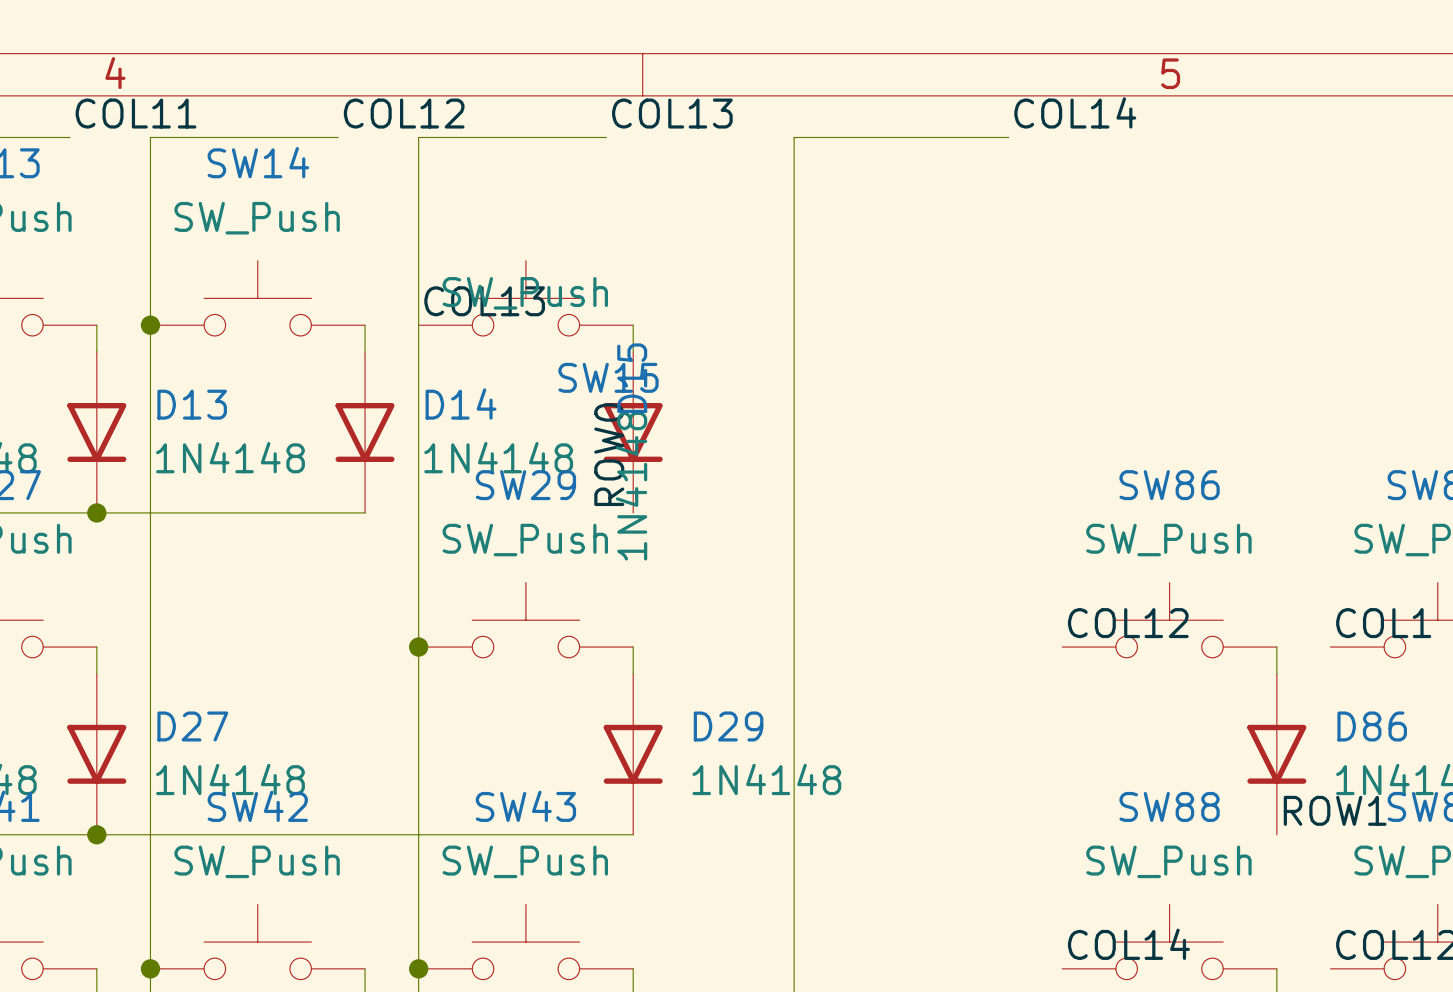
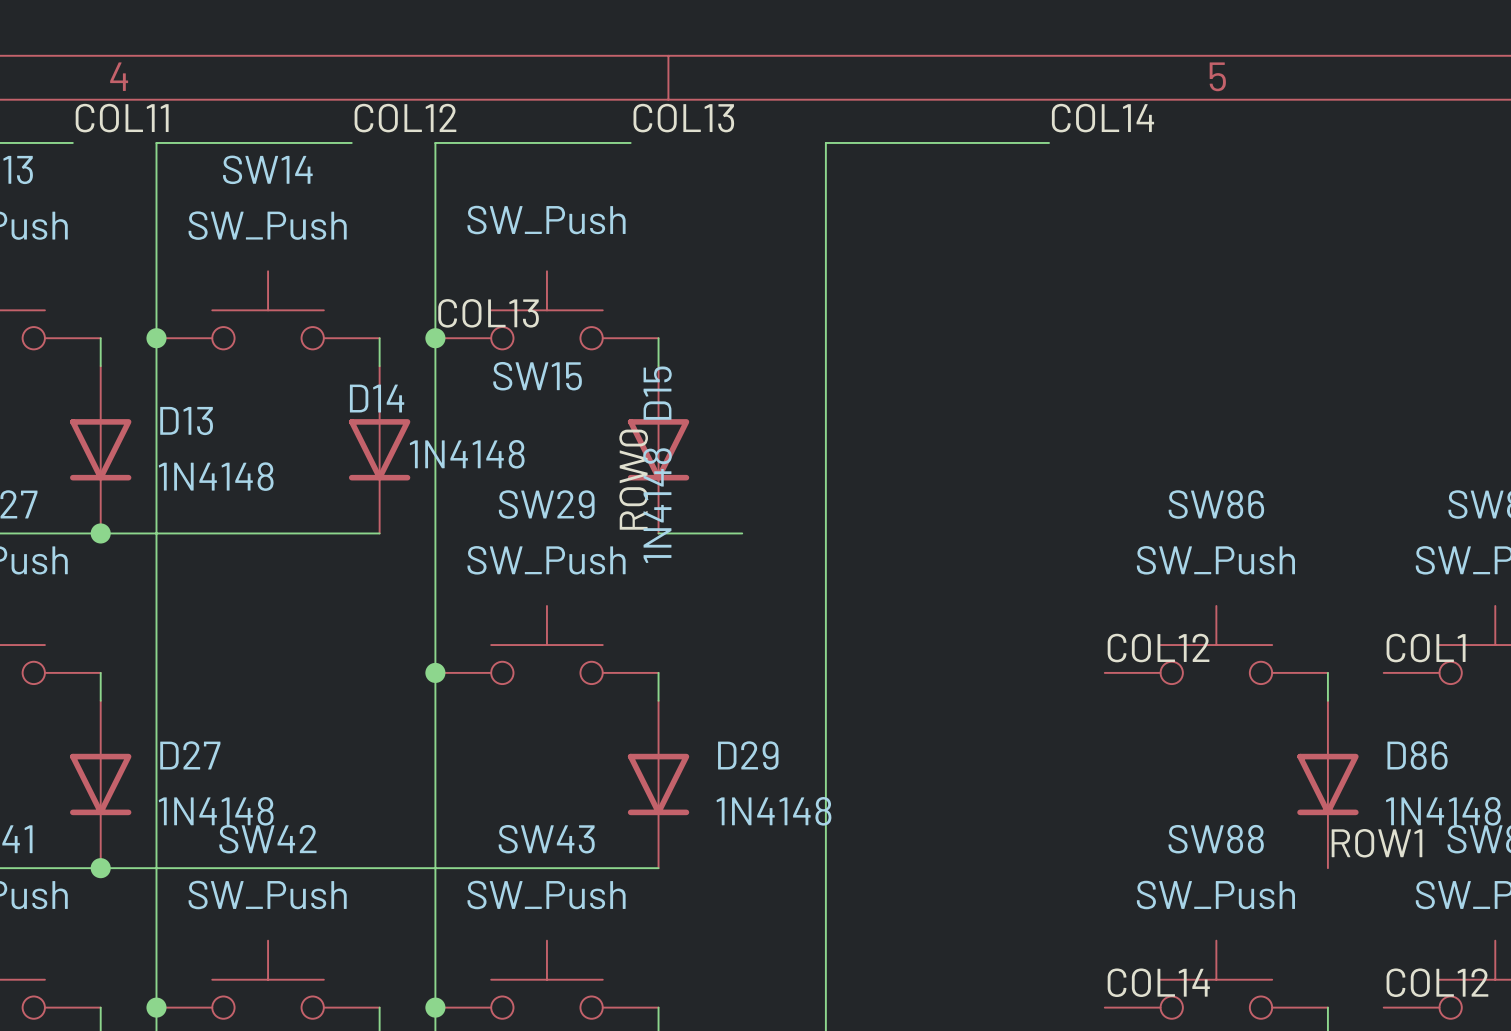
SW15 value position: SW_Push (525, 293) -> SW_Push (546, 220)
junction: none -> (435, 338)
SW15 name position: SW15 (608, 377) -> SW15 (537, 376)
D14 name position: D14 (461, 404) -> D14 (377, 398)
D14 value position: 1N4148 (498, 457) -> 1N4148 (467, 454)
wire: none -> (658, 533) (742, 533)

